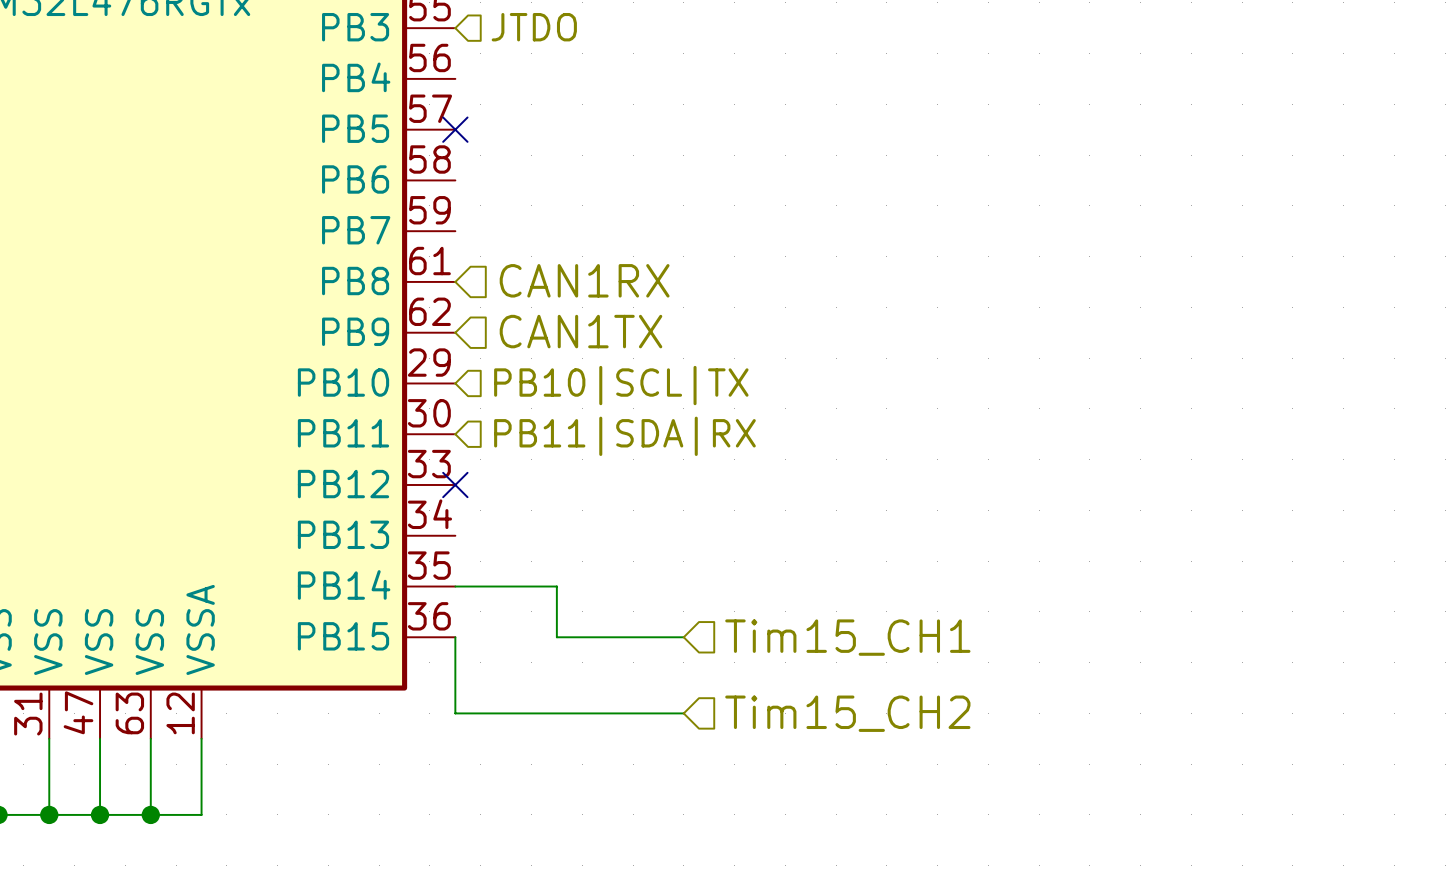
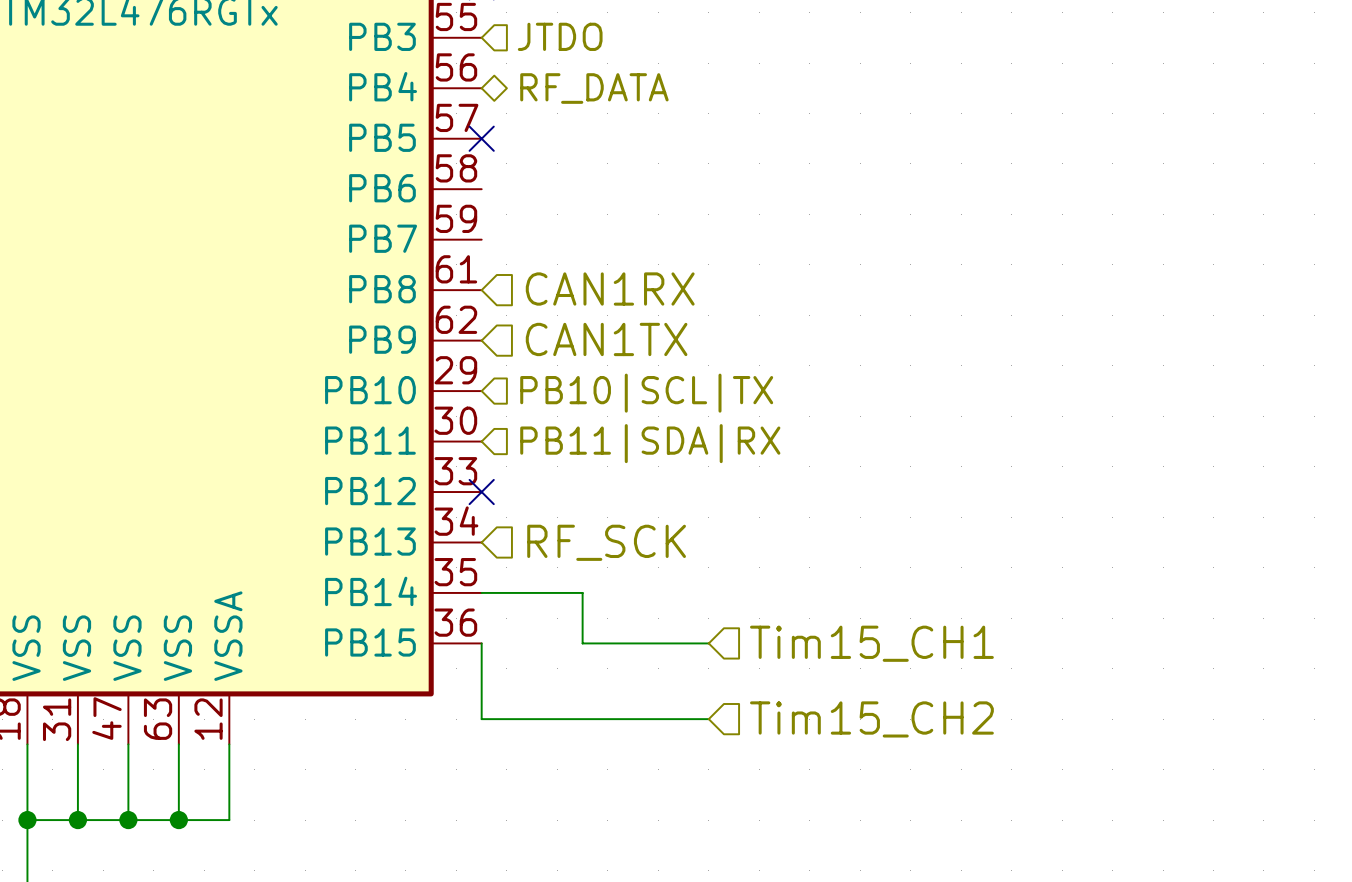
hierarchical label: none -> RF_DATA (594, 88)
hierarchical label: none -> RF_SCK (606, 542)

